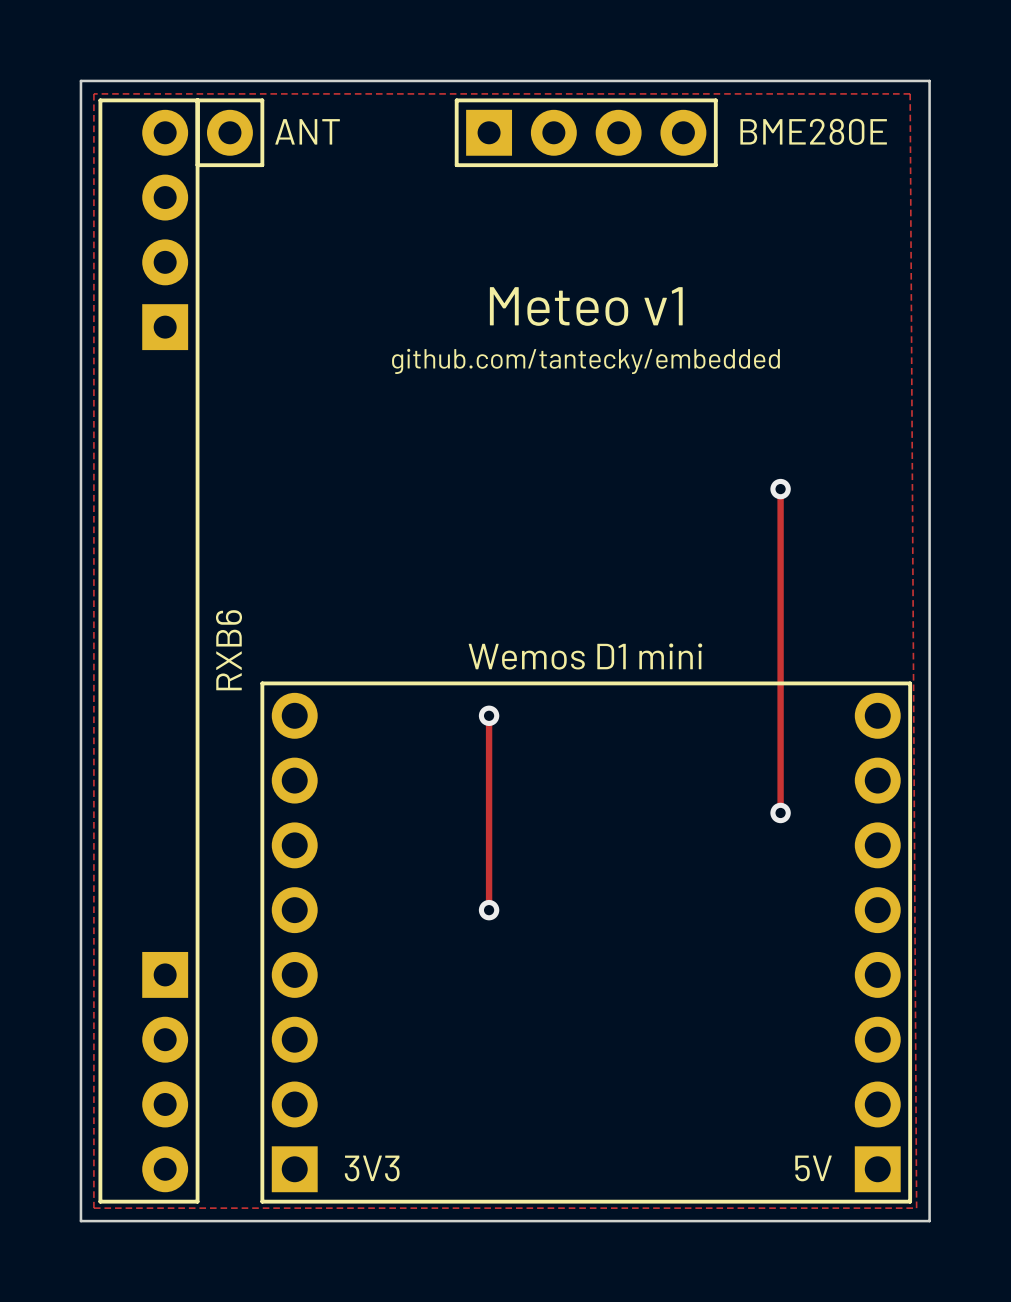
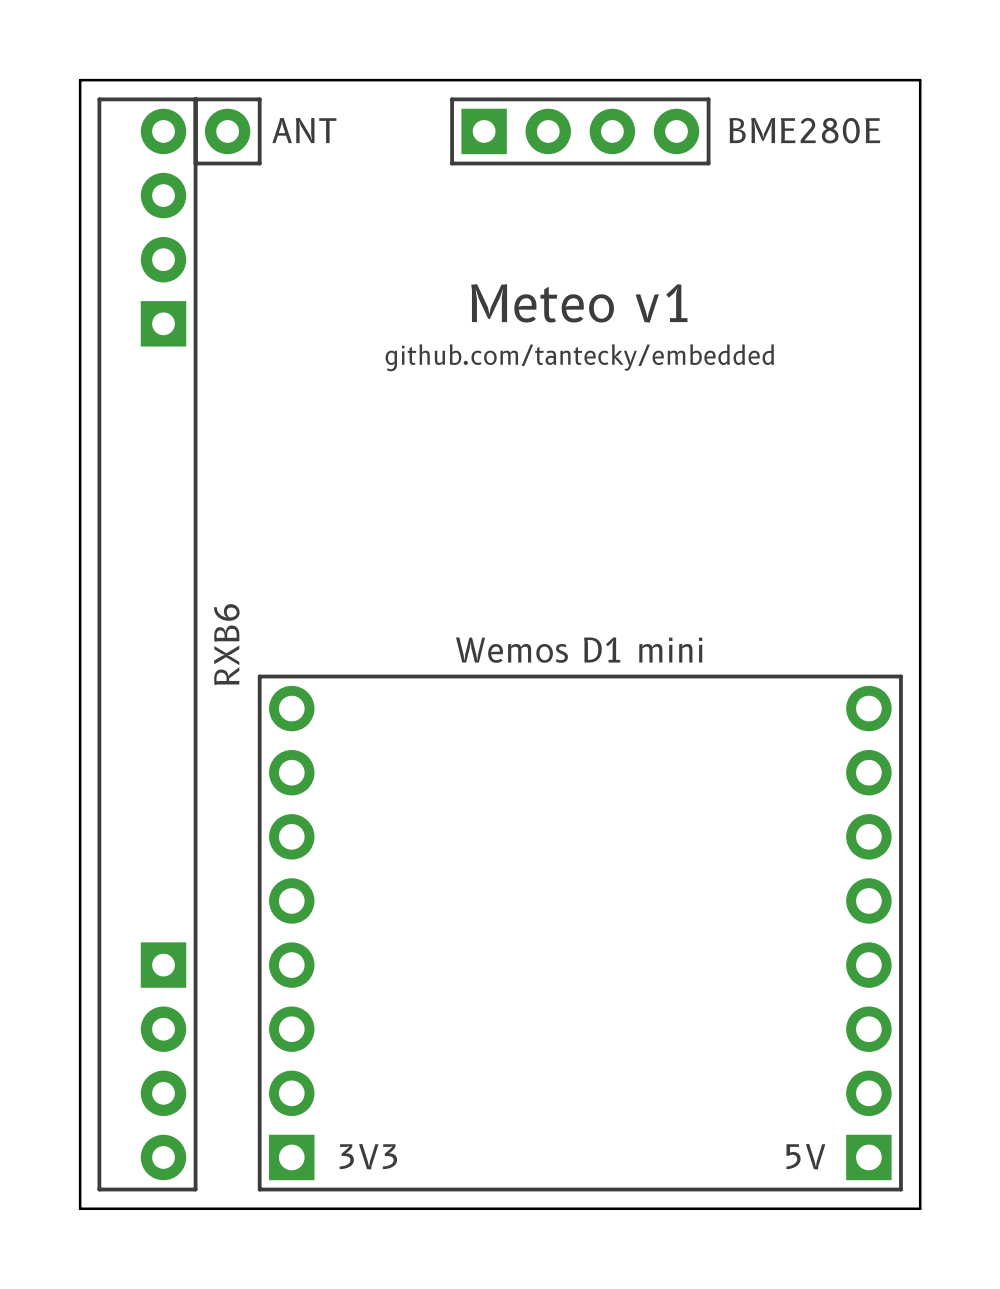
zone outline: (93, 93) (910, 93) (916, 1208) (93, 1208) (93, 93) -> none
track: (780, 489) (780, 812) -> none
via: (780, 489) -> none
track: (489, 715) (489, 910) -> none
via: (489, 715) -> none
via: (780, 812) -> none
via: (489, 910) -> none

